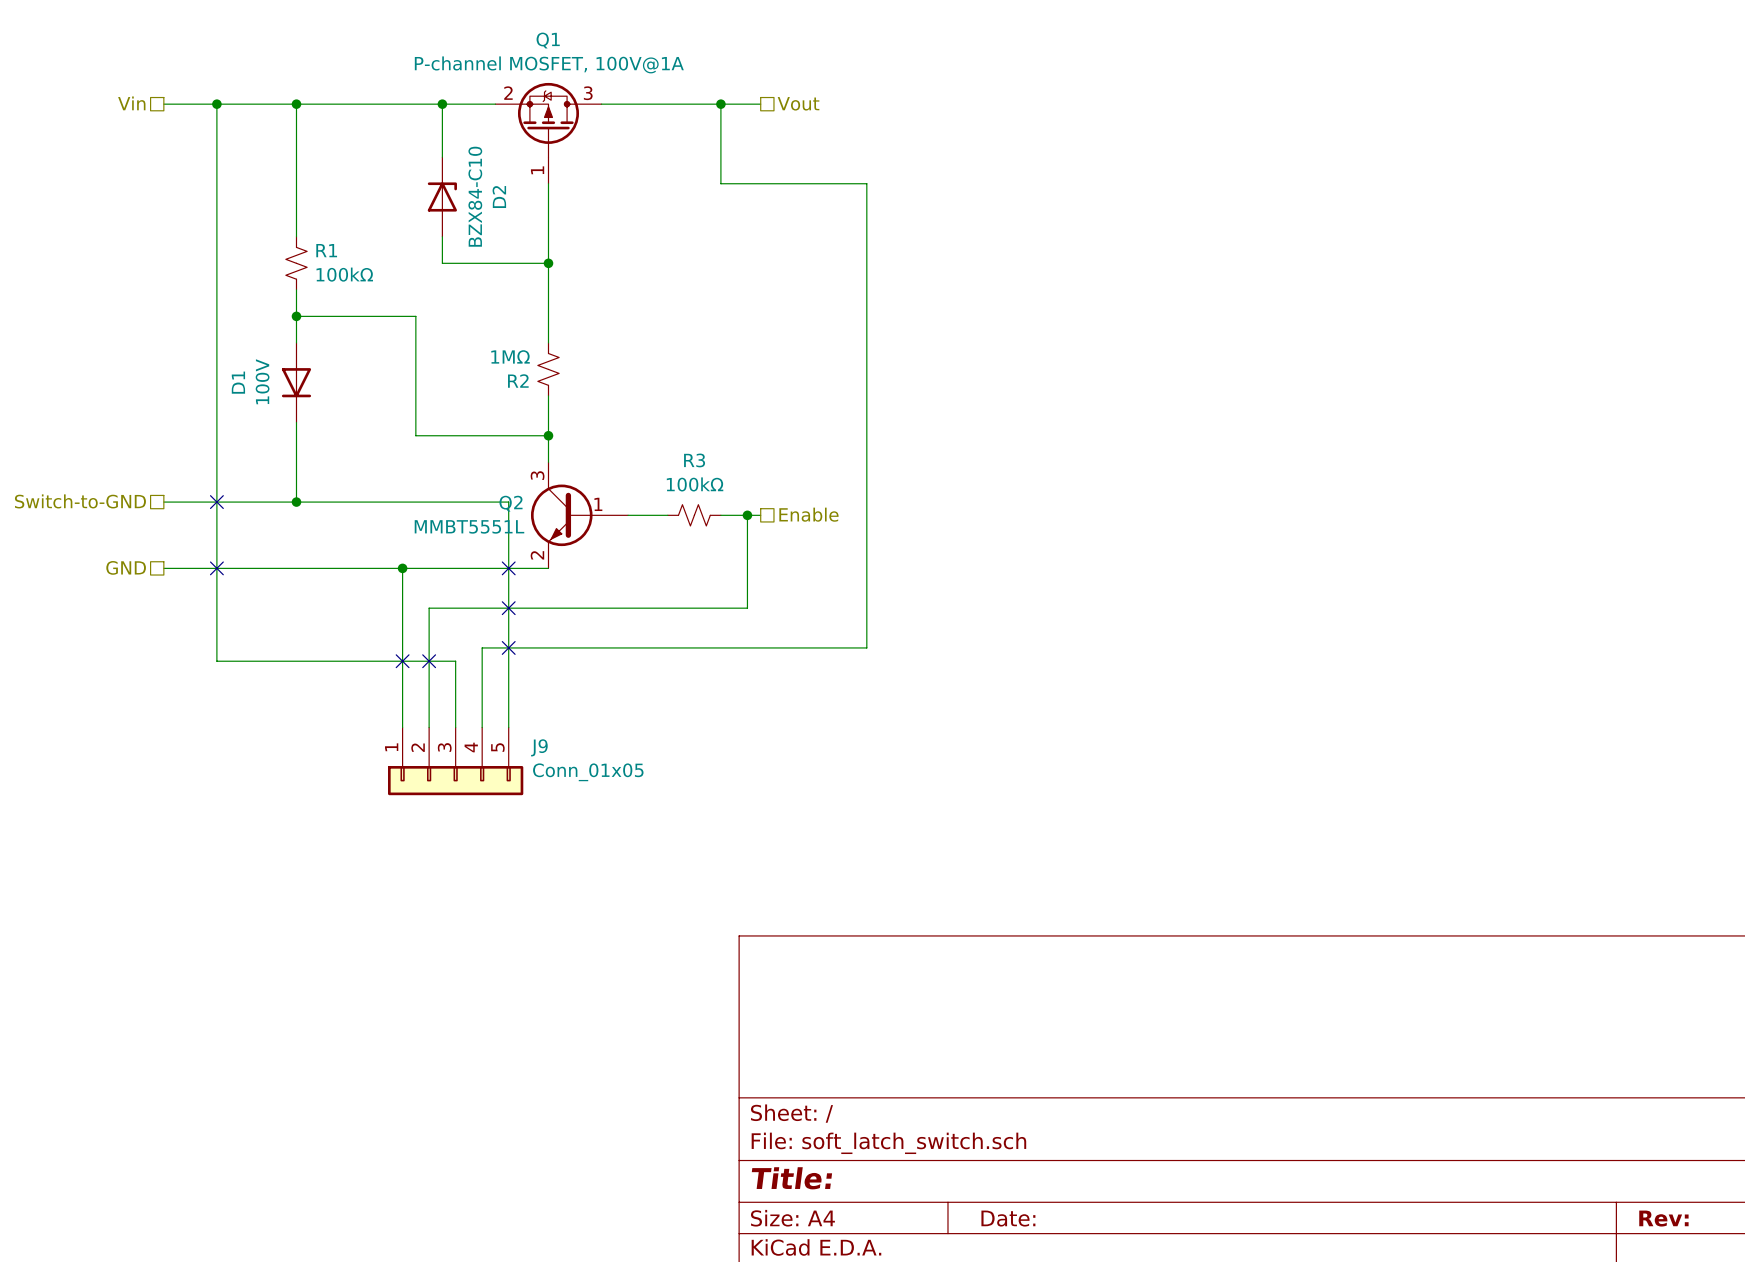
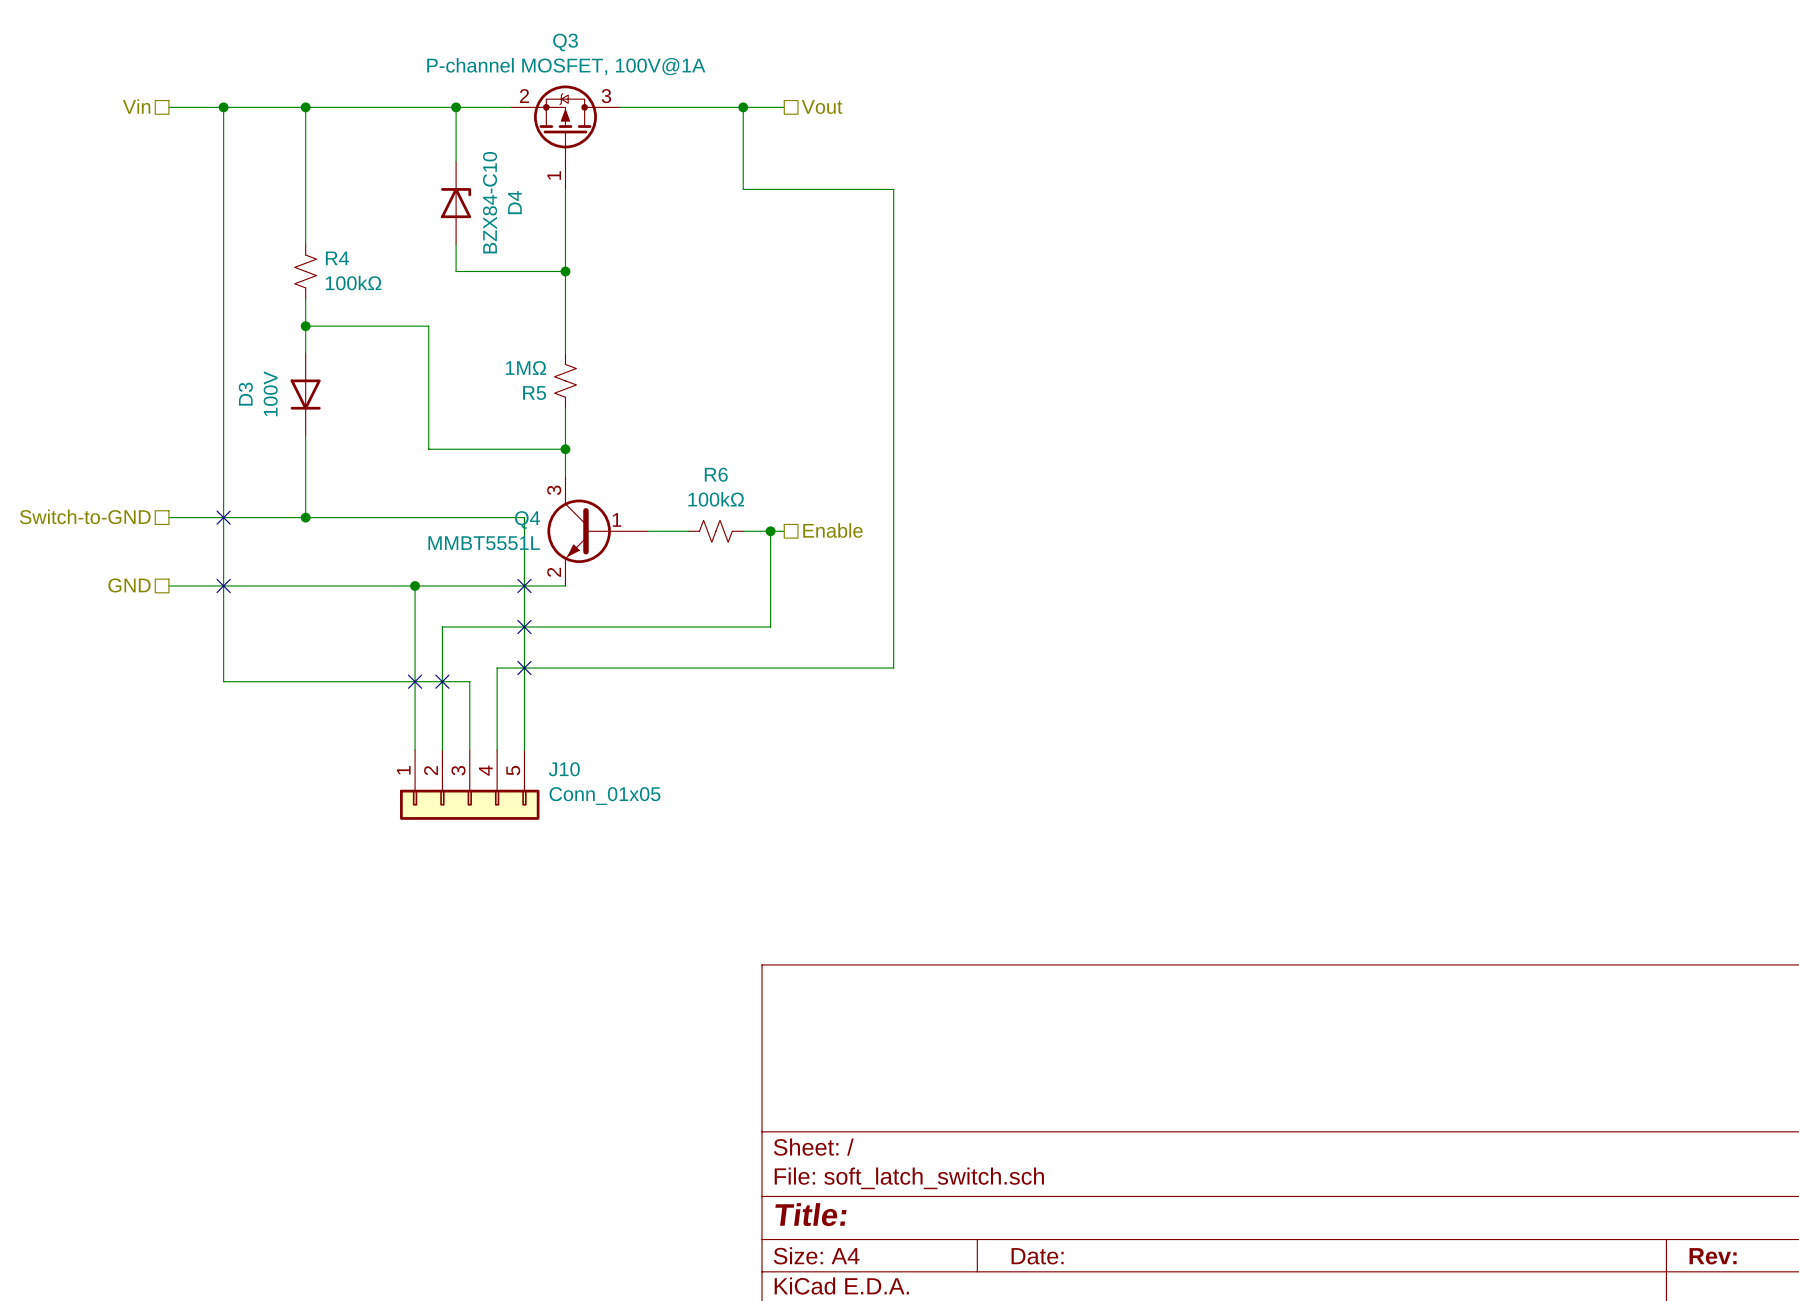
Q1 name: Q1 (548, 40) -> Q3 (565, 42)
D2 name: D2 (499, 197) -> D4 (514, 202)
R1 name: R1 (326, 250) -> R4 (337, 258)
R2 name: R2 (518, 381) -> R5 (534, 393)
D1 name: D1 (238, 382) -> D3 (245, 394)
R3 name: R3 (694, 460) -> R6 (716, 474)
Q2 name: Q2 (511, 503) -> Q4 (527, 519)
J9 name: J9 (539, 747) -> J10 (564, 769)

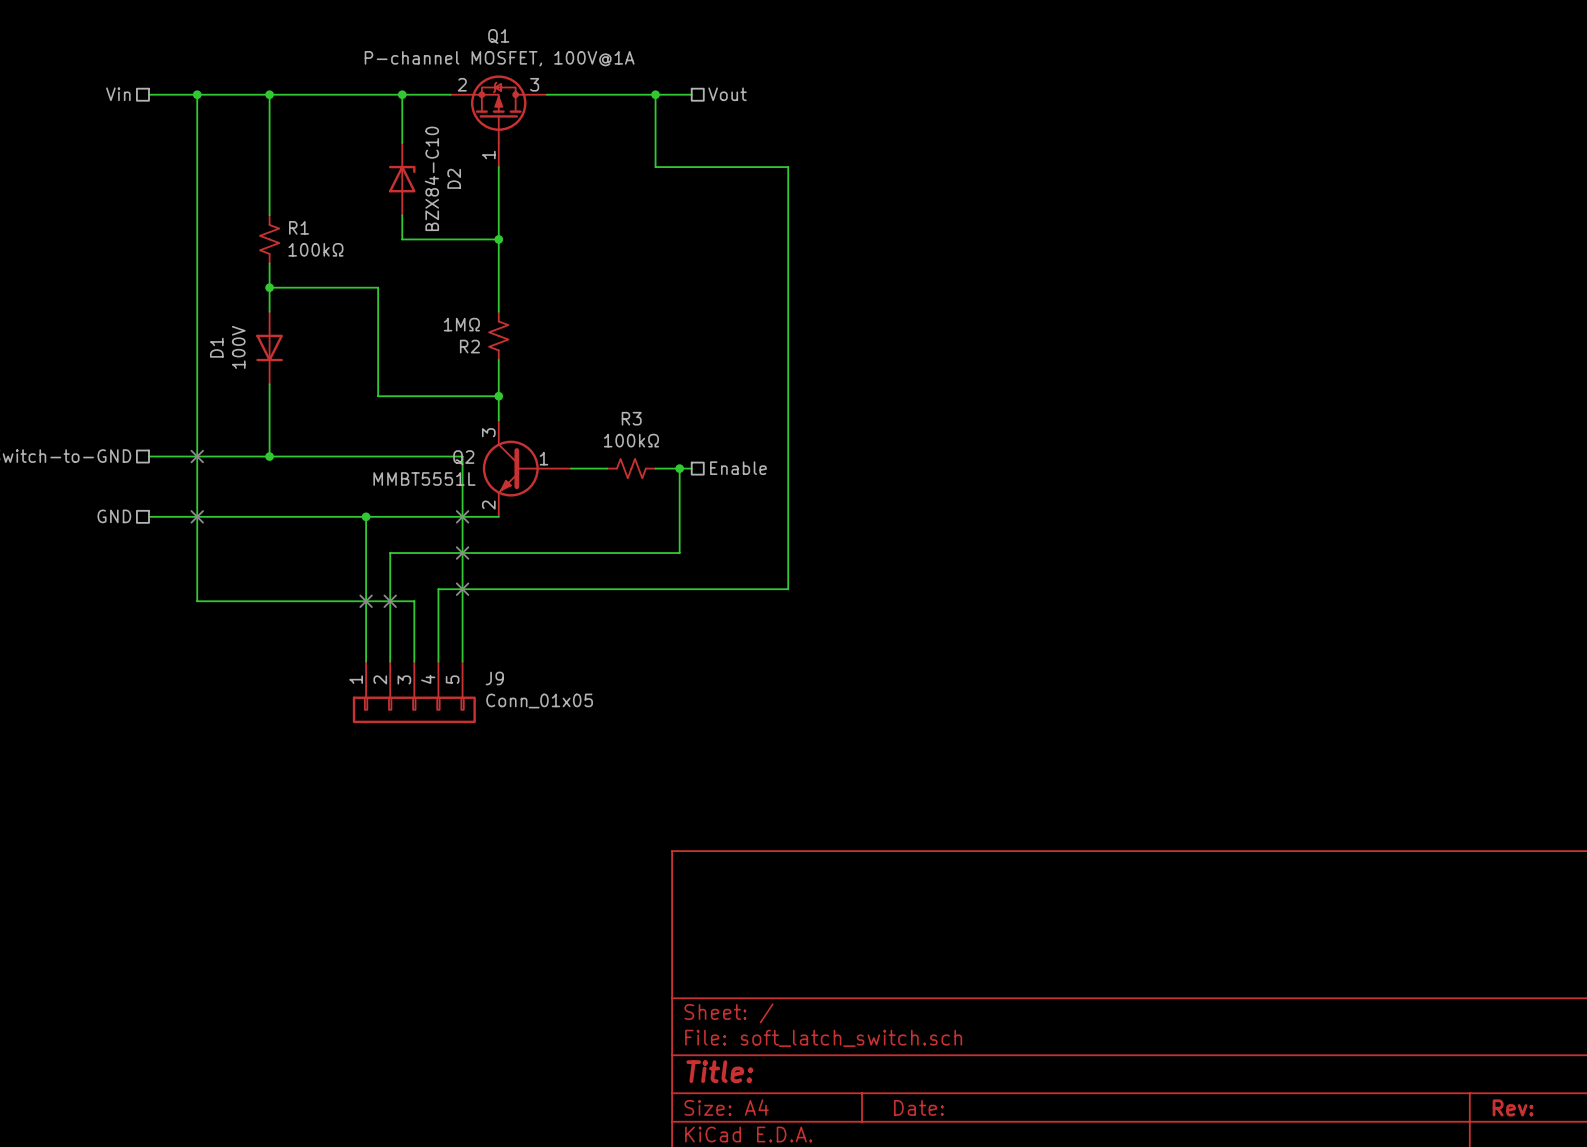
Q3 name: Q3 (565, 42) -> Q1 (498, 36)
D4 name: D4 (514, 202) -> D2 (454, 178)
R4 name: R4 (337, 258) -> R1 (299, 227)
R5 name: R5 (534, 393) -> R2 (469, 346)
D3 name: D3 (245, 394) -> D1 (216, 347)
R6 name: R6 (716, 474) -> R3 (631, 418)
Q4 name: Q4 (527, 519) -> Q2 (463, 457)
J10 name: J10 (564, 769) -> J9 (494, 678)

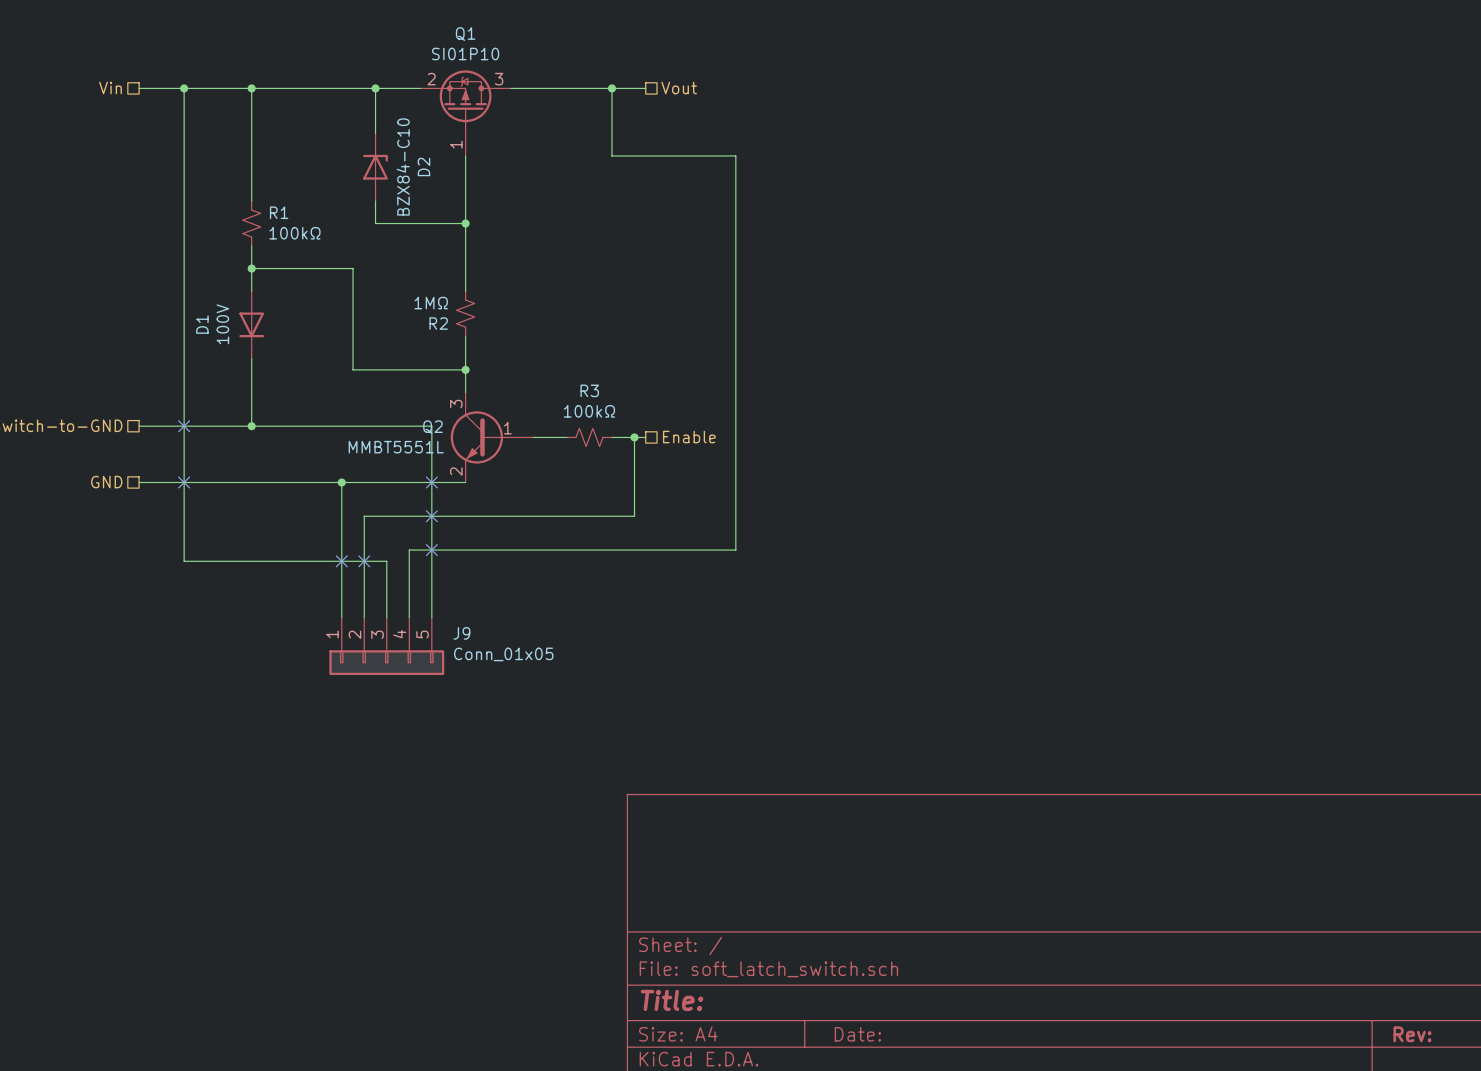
Q1 value: P-channel MOSFET, 100V@1A (499, 58) -> SI01P10 (465, 53)

